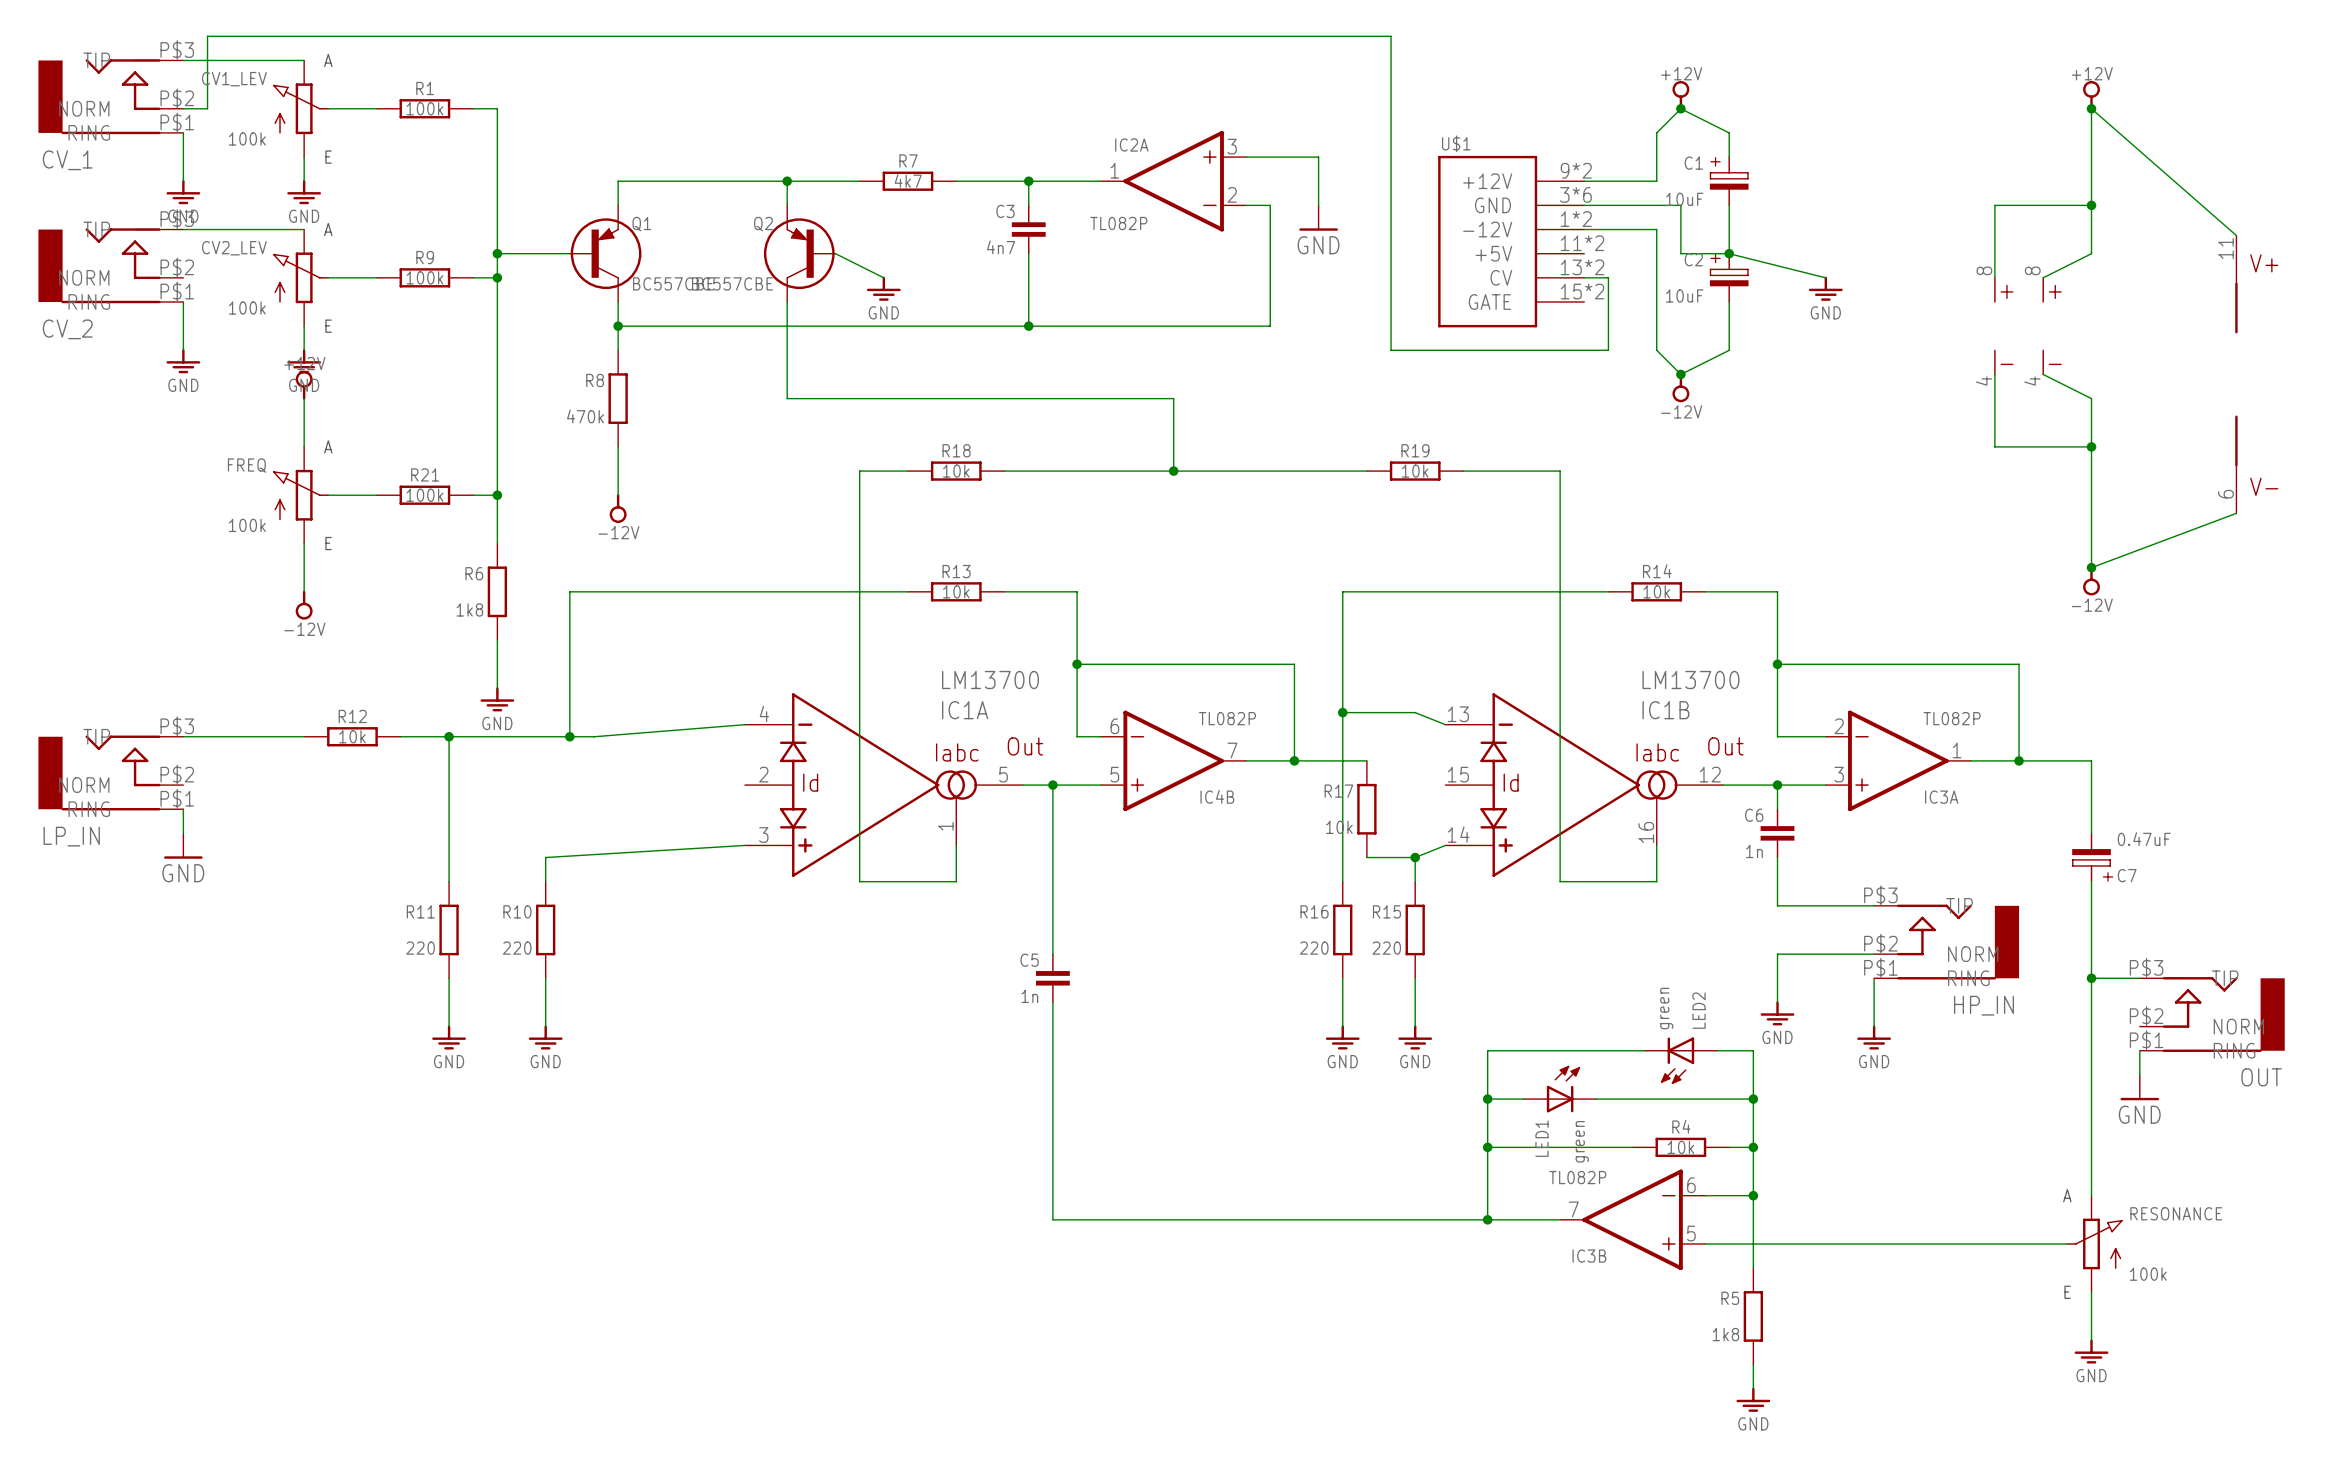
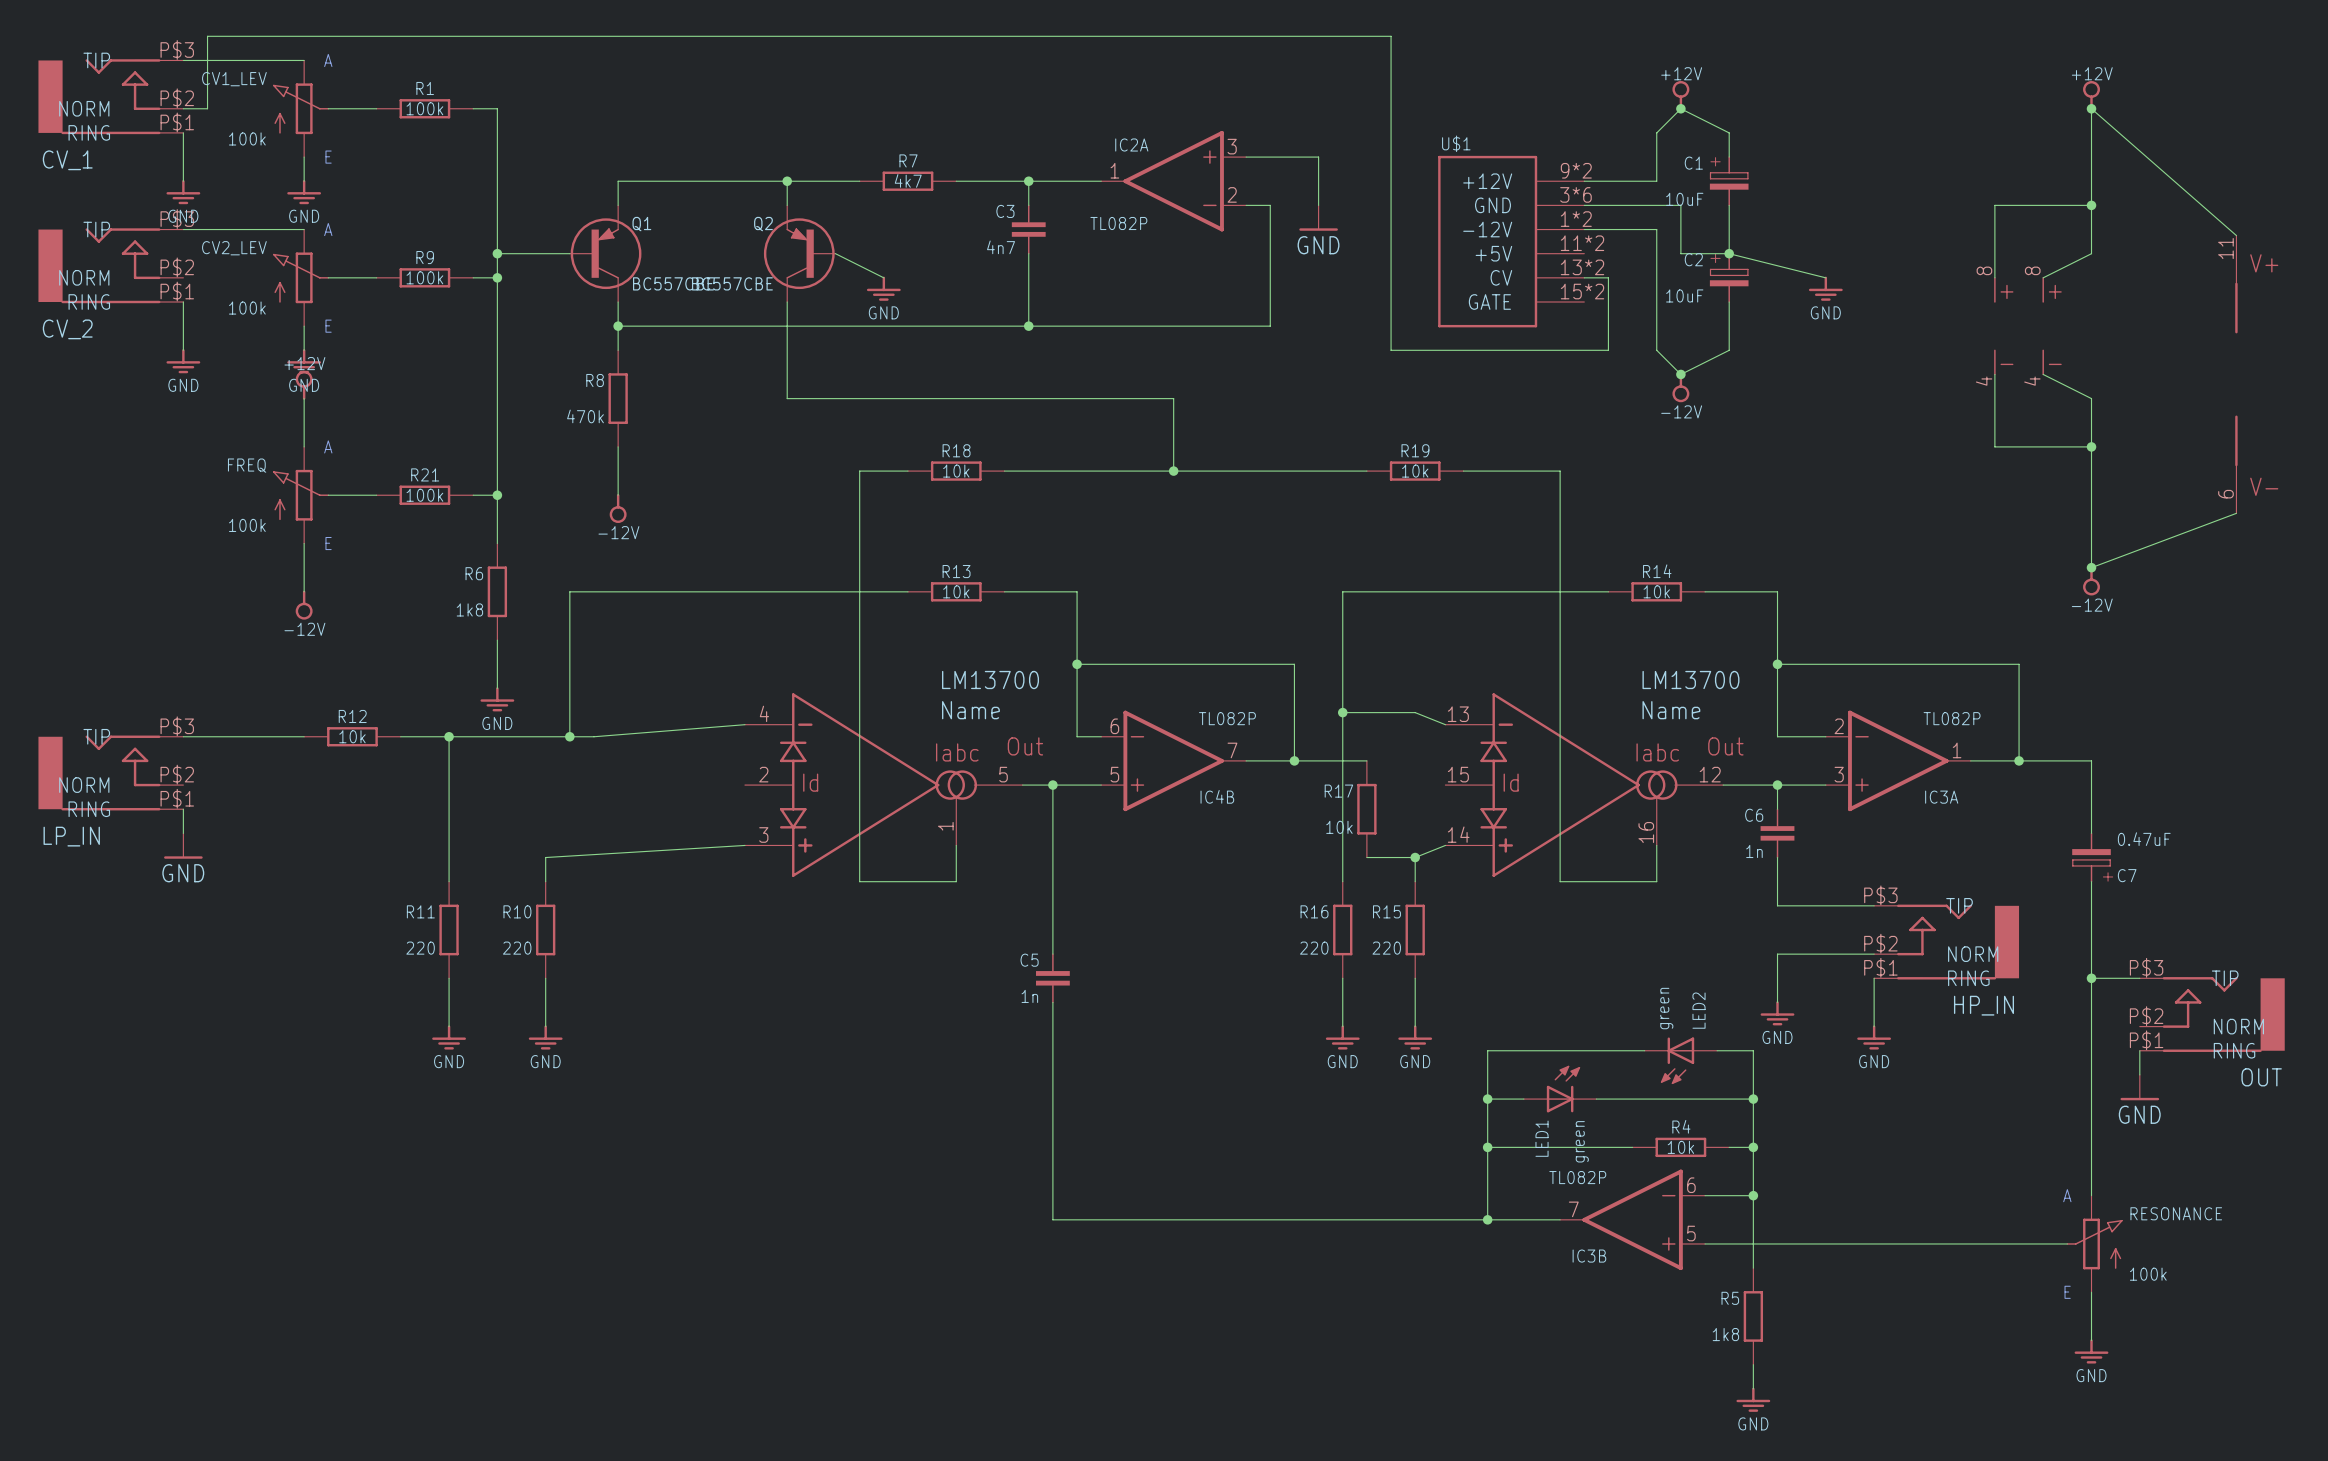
IC1A name: IC1A (965, 710) -> none
IC1A text: none -> Name (970, 710)
IC1B name: IC1B (1665, 710) -> none
IC1B text: none -> Name (1671, 710)

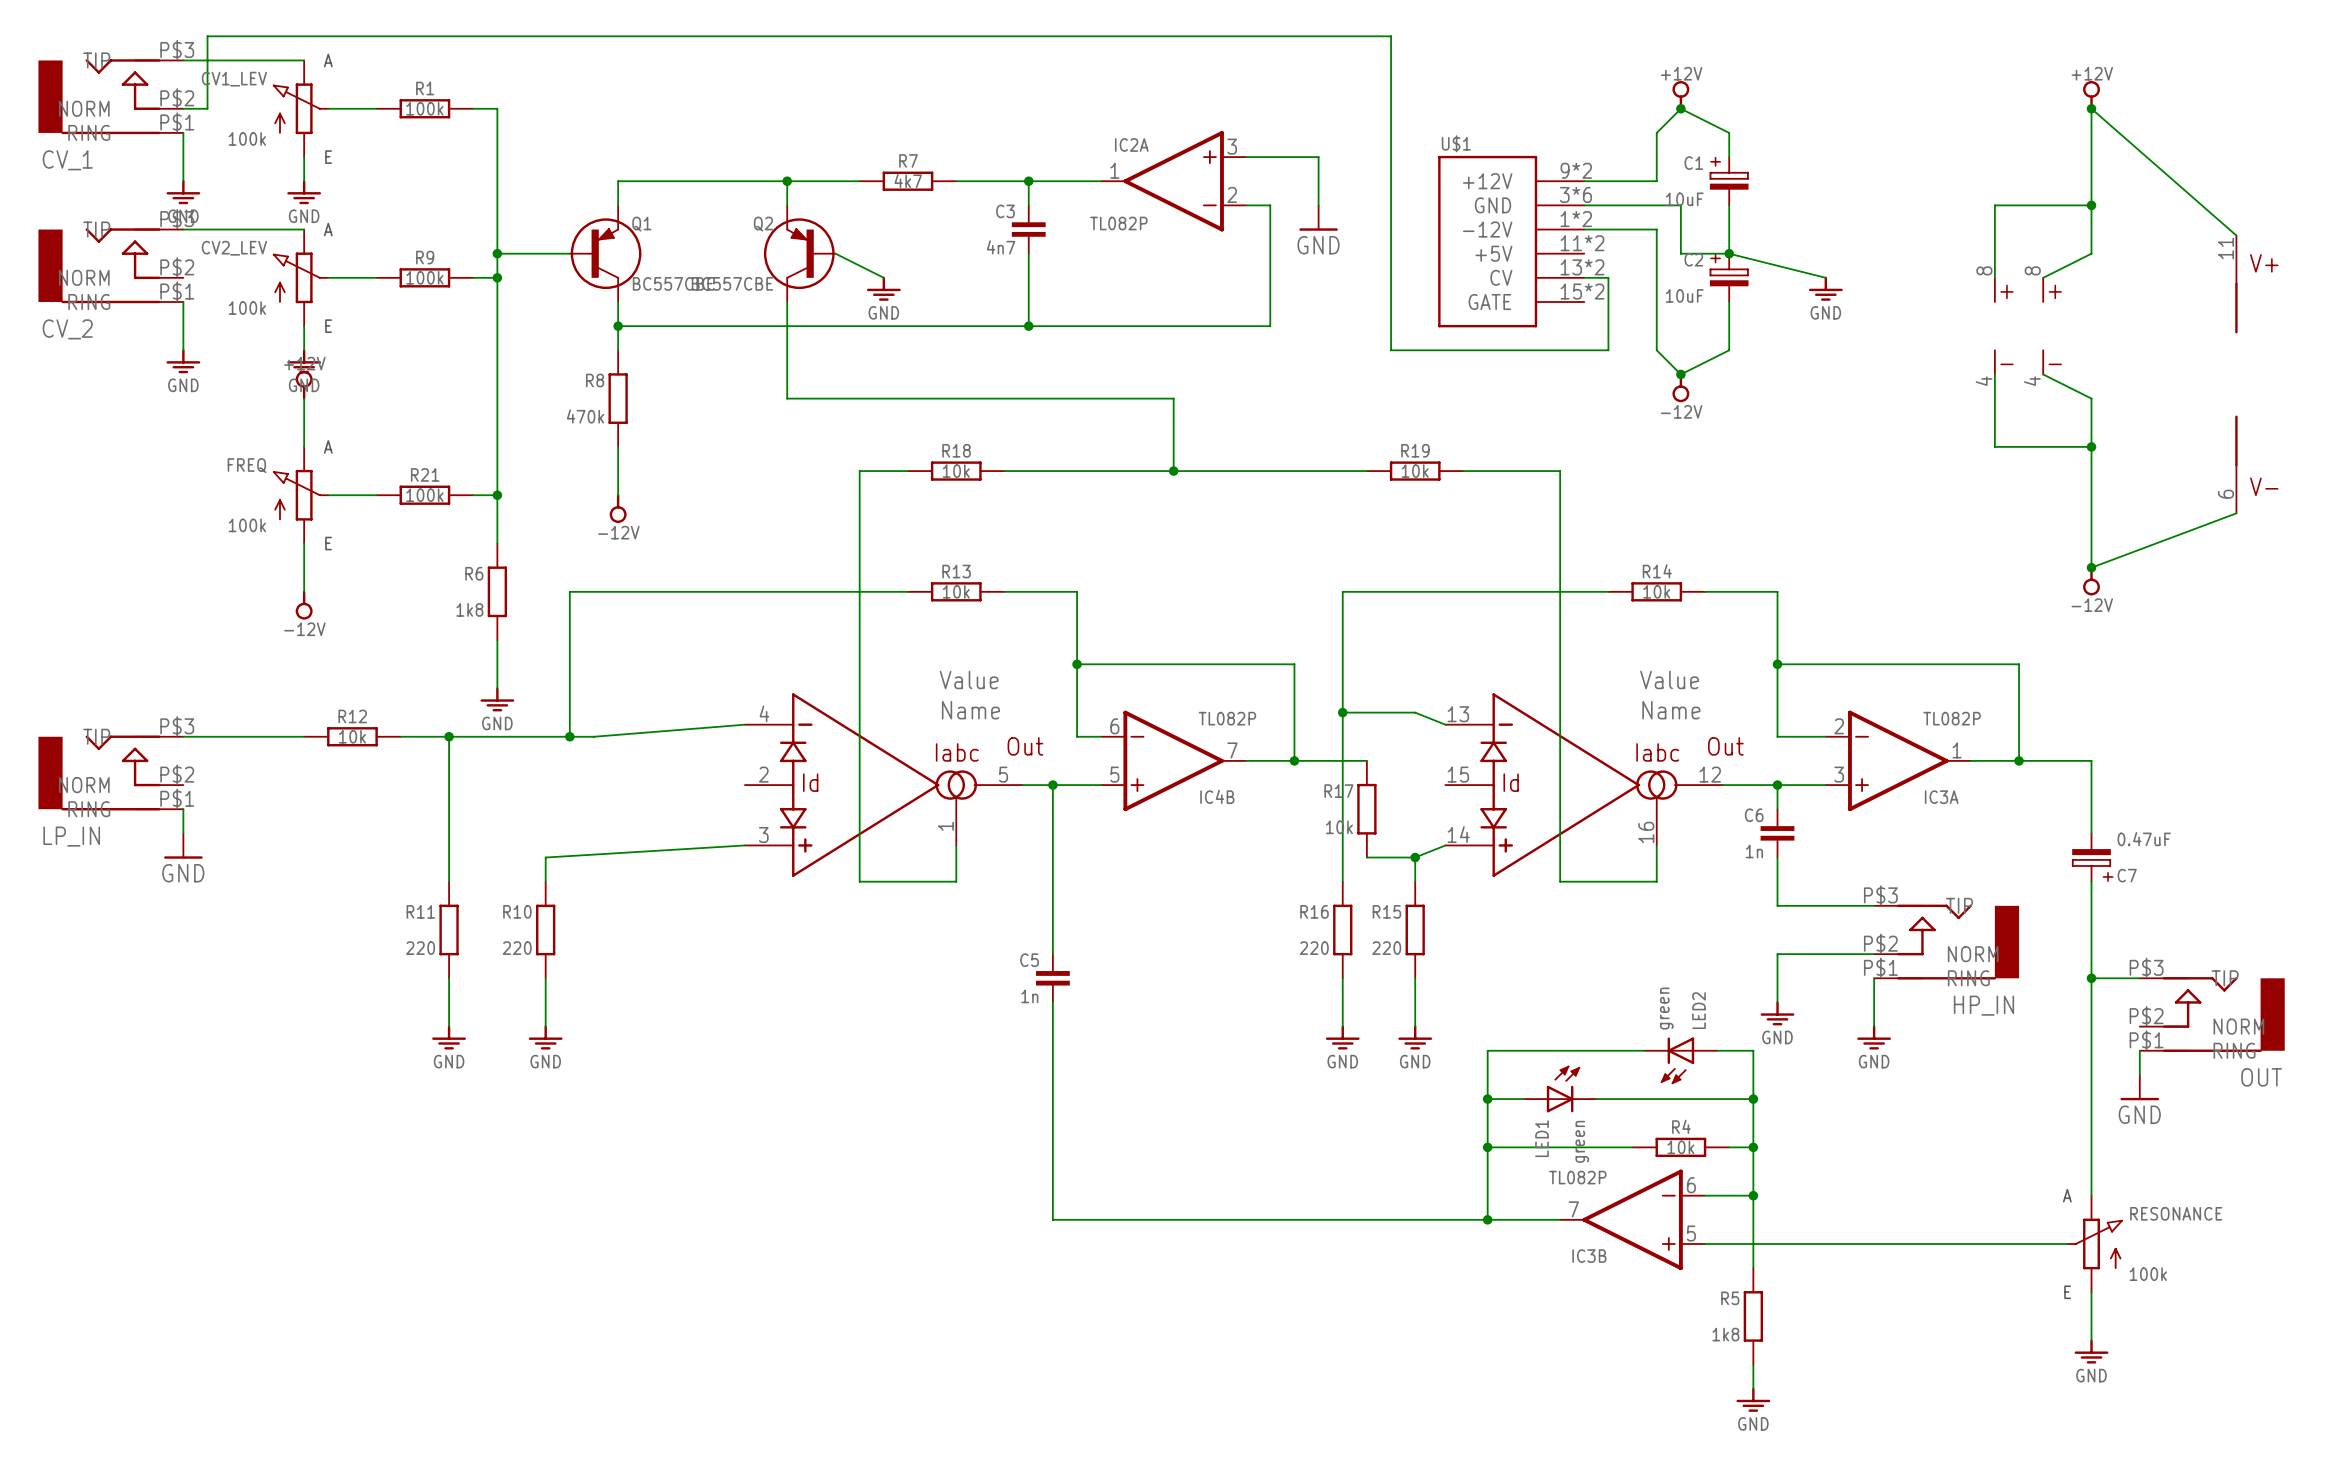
part text: none -> Value (969, 680)
part value: LM13700 (990, 680) -> none
part text: none -> Value (1669, 680)
part value: LM13700 (1690, 680) -> none

